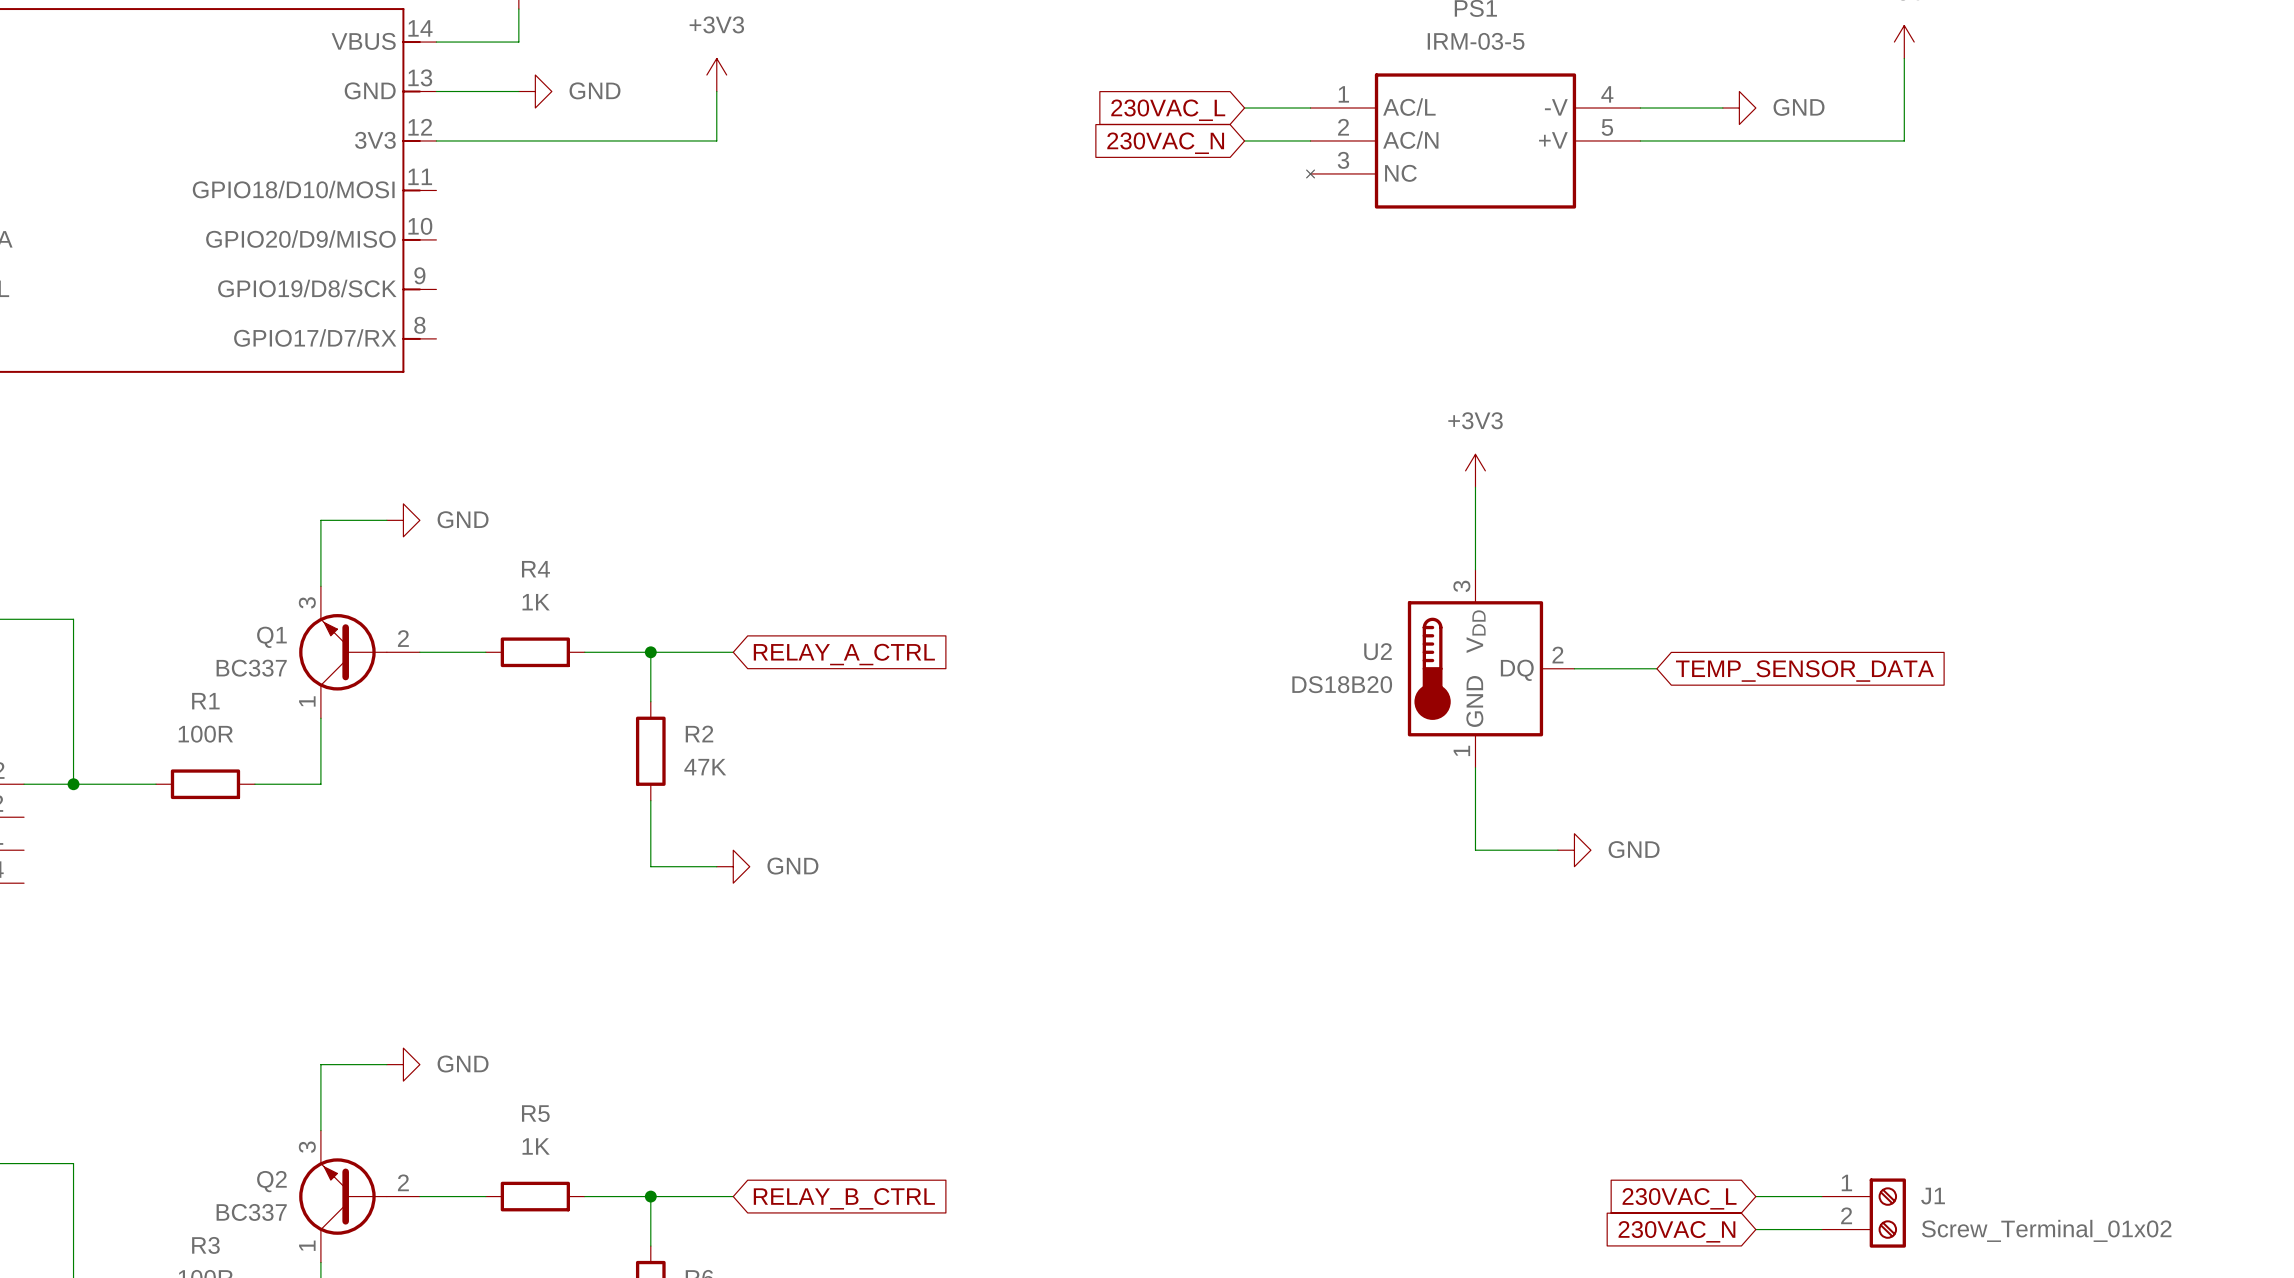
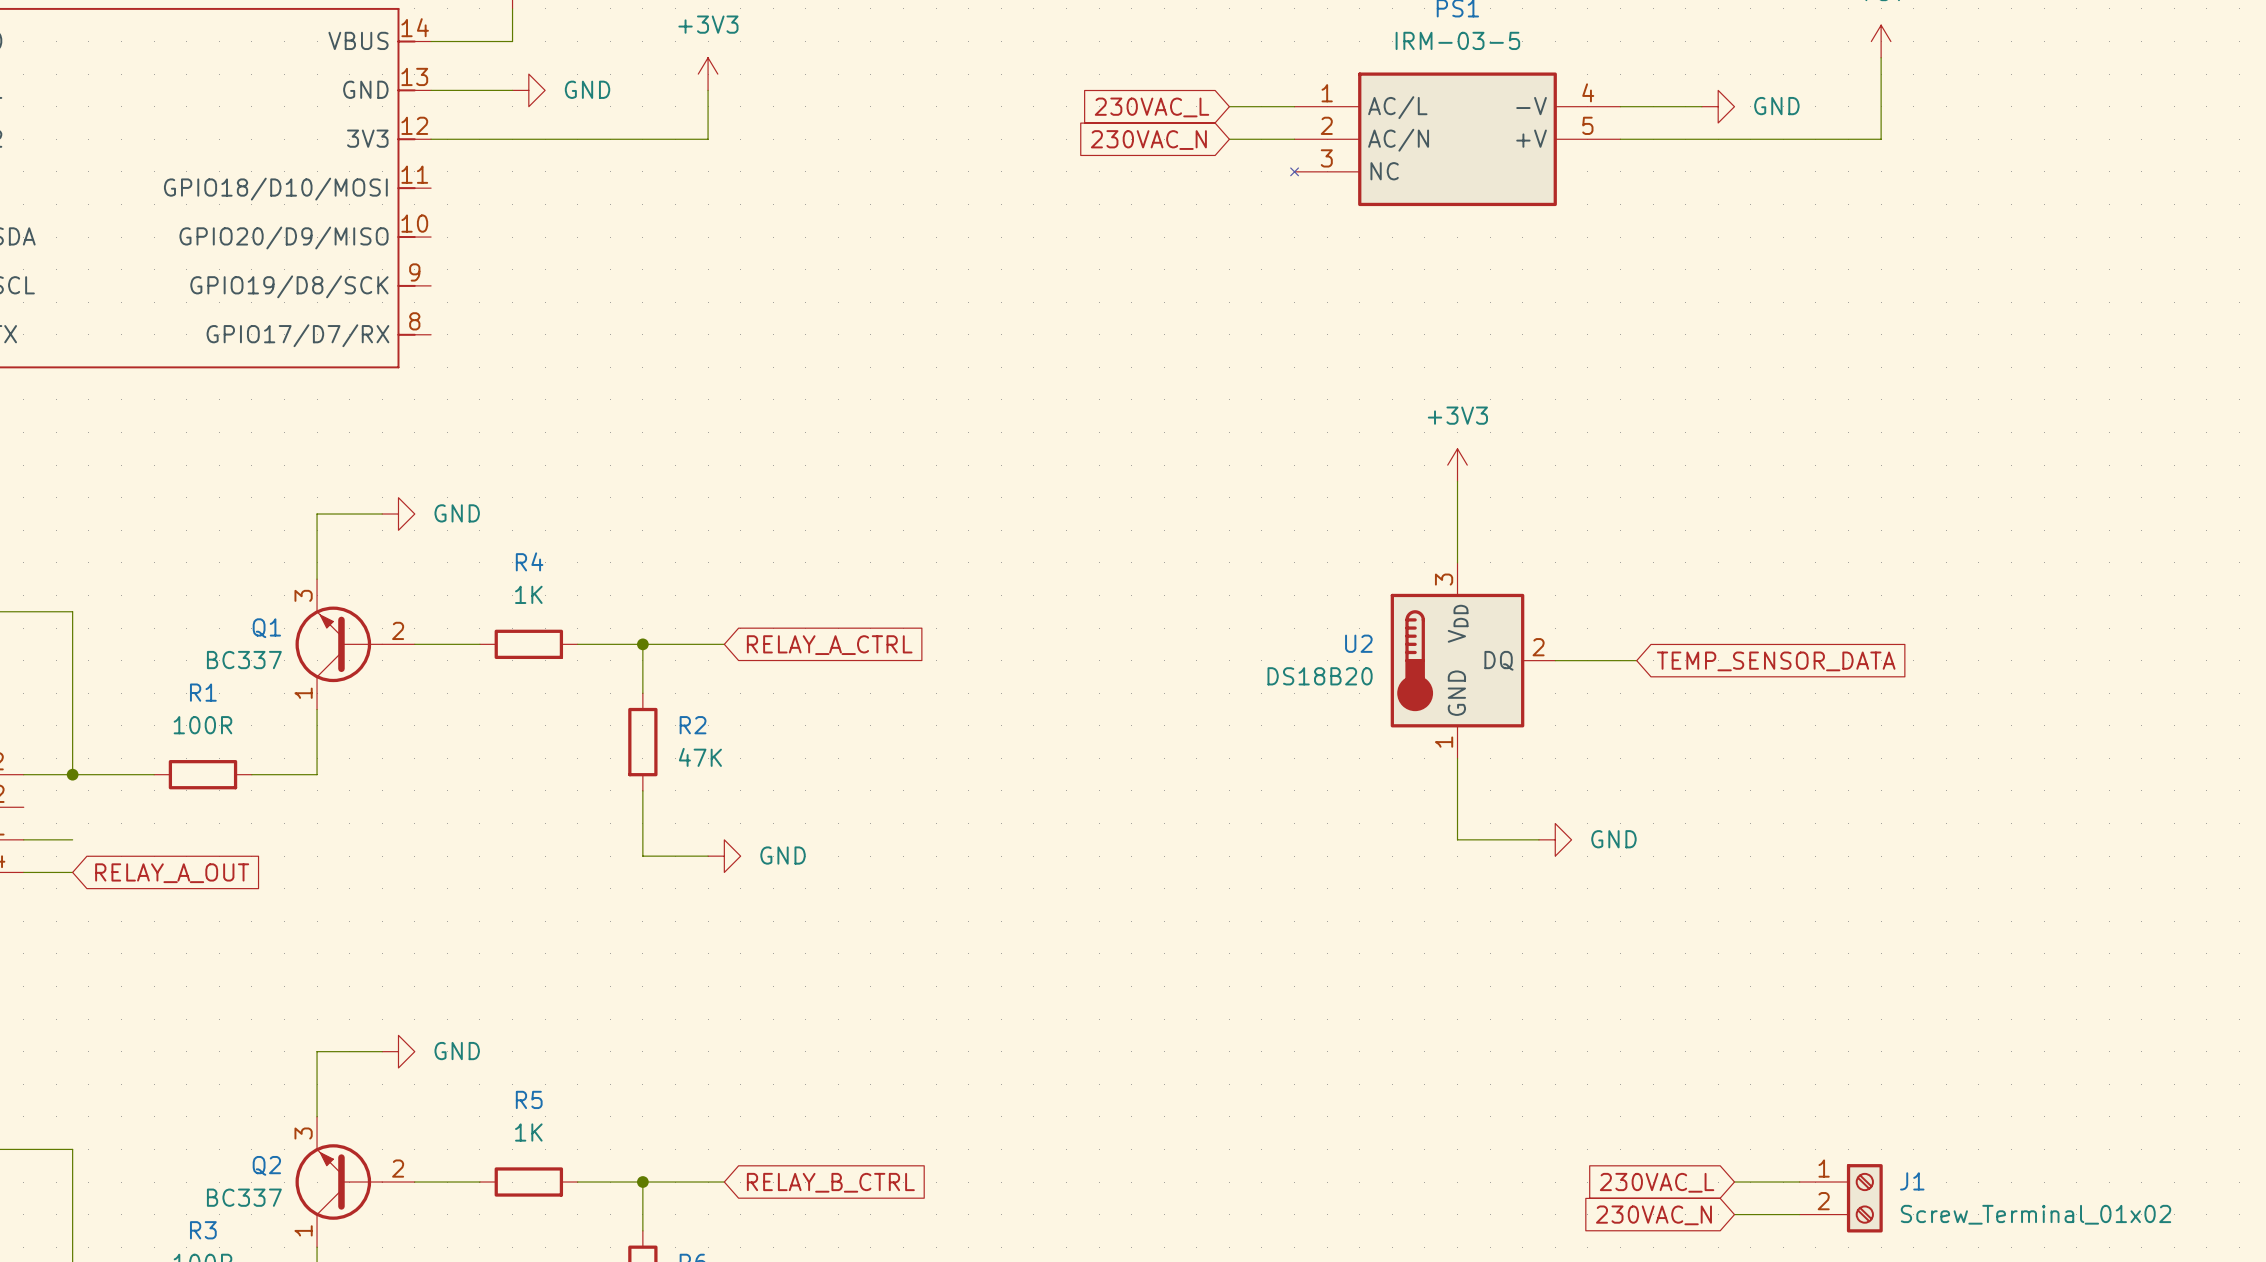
wire: none -> (23, 839) (72, 839)
wire: none -> (23, 872) (72, 872)
global label: none -> RELAY_A_OUT (172, 873)

